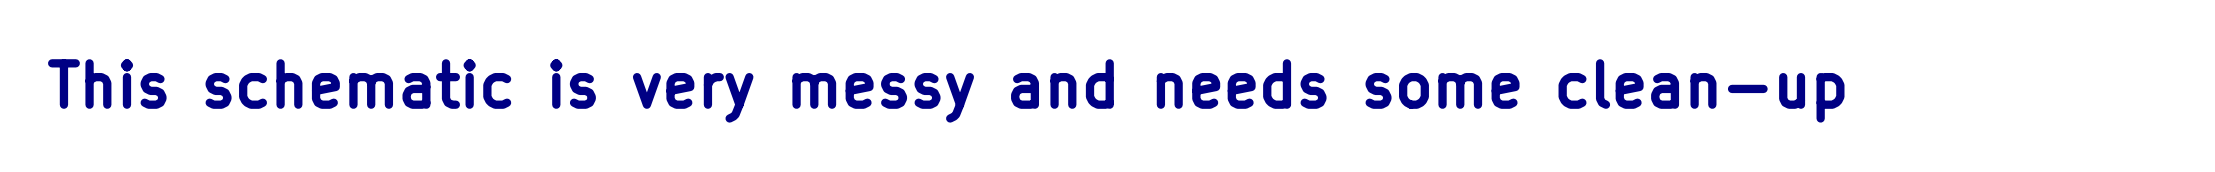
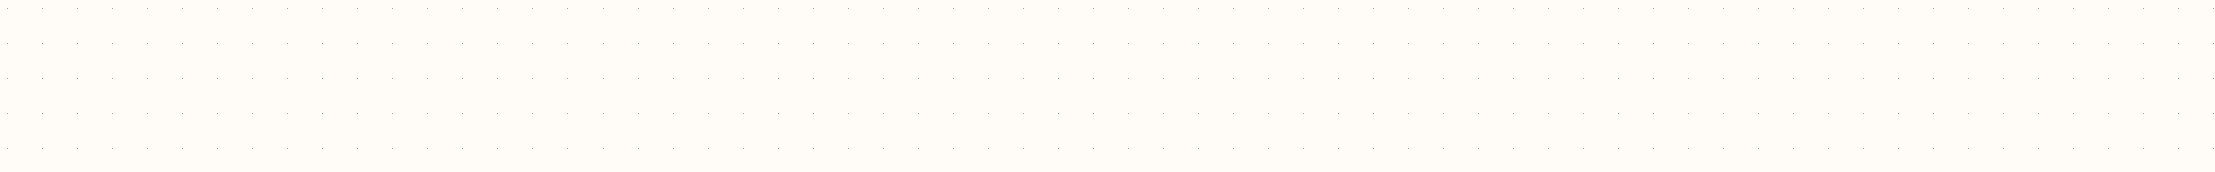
text: This schematic is very messy and needs some clean-up (946, 90) -> none

